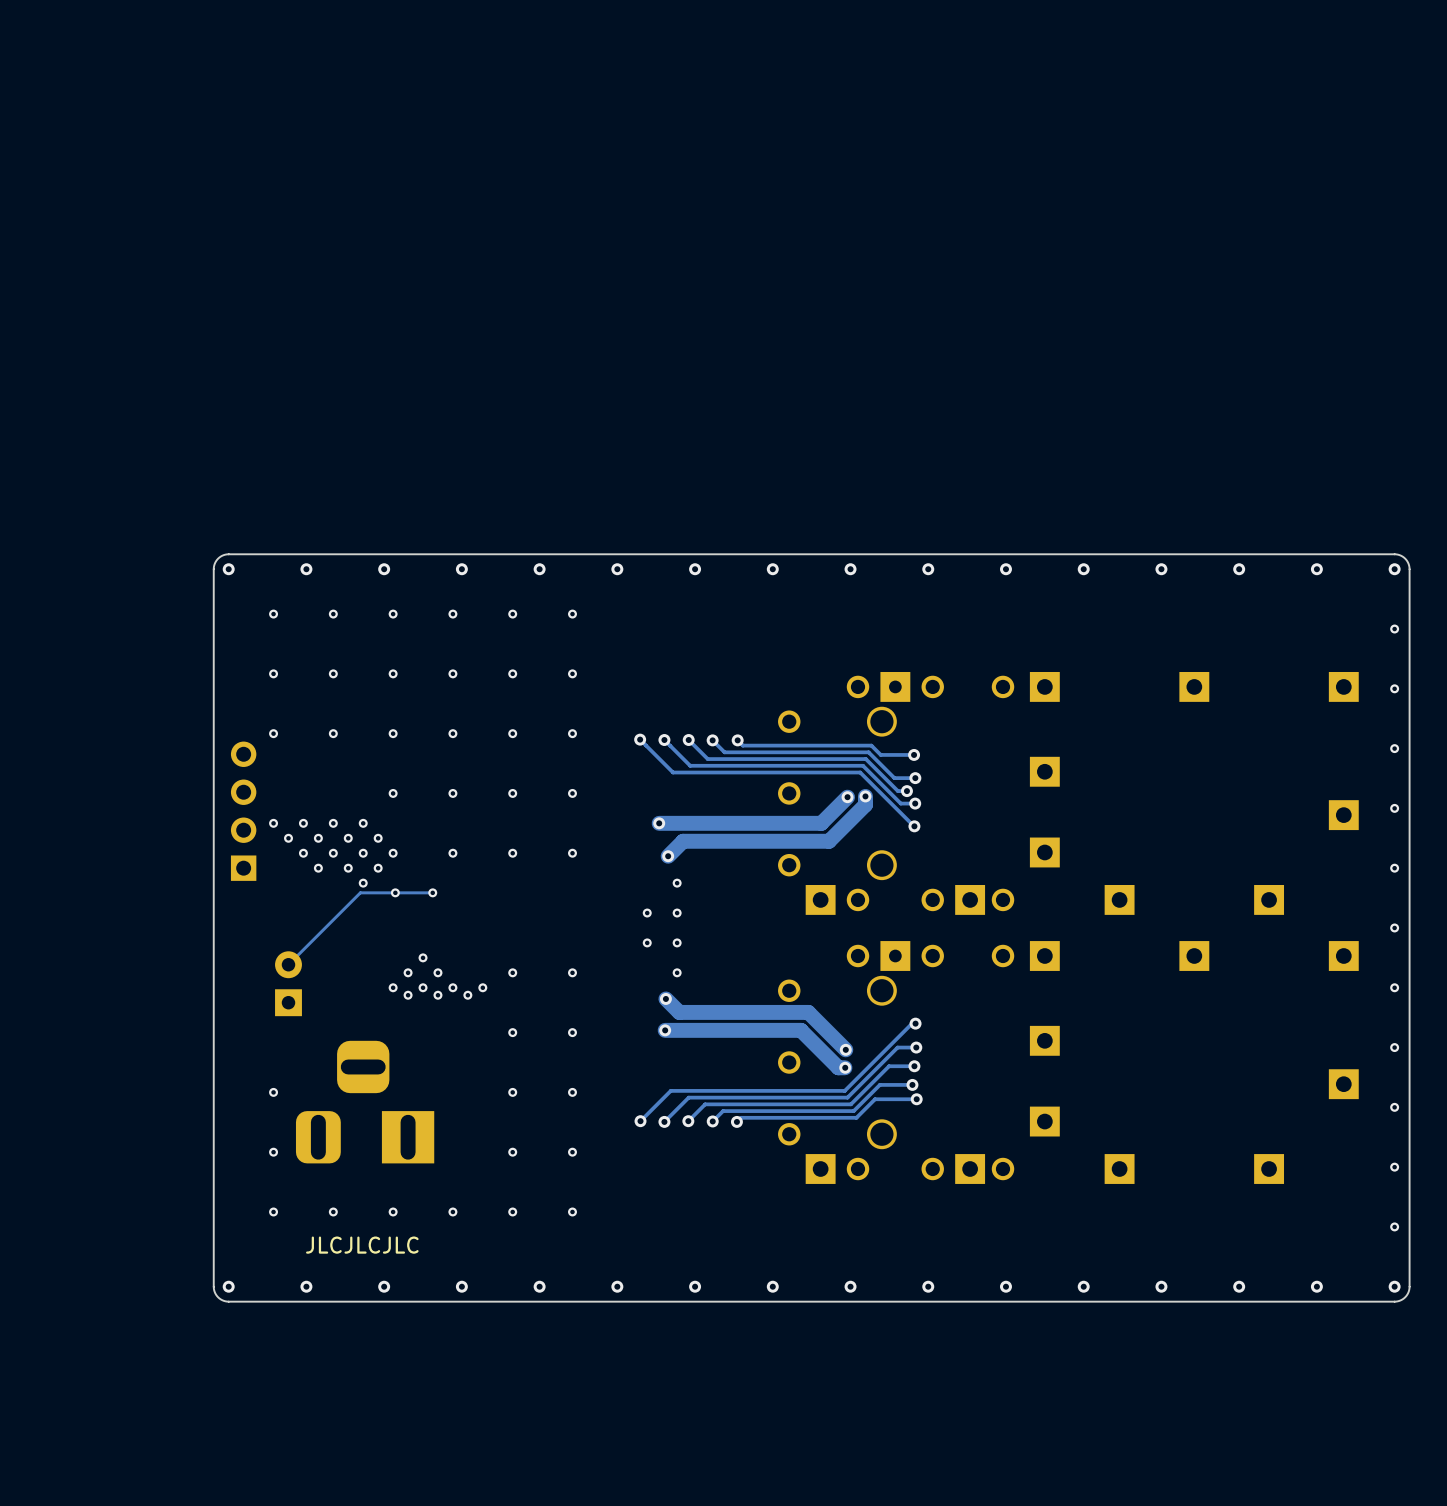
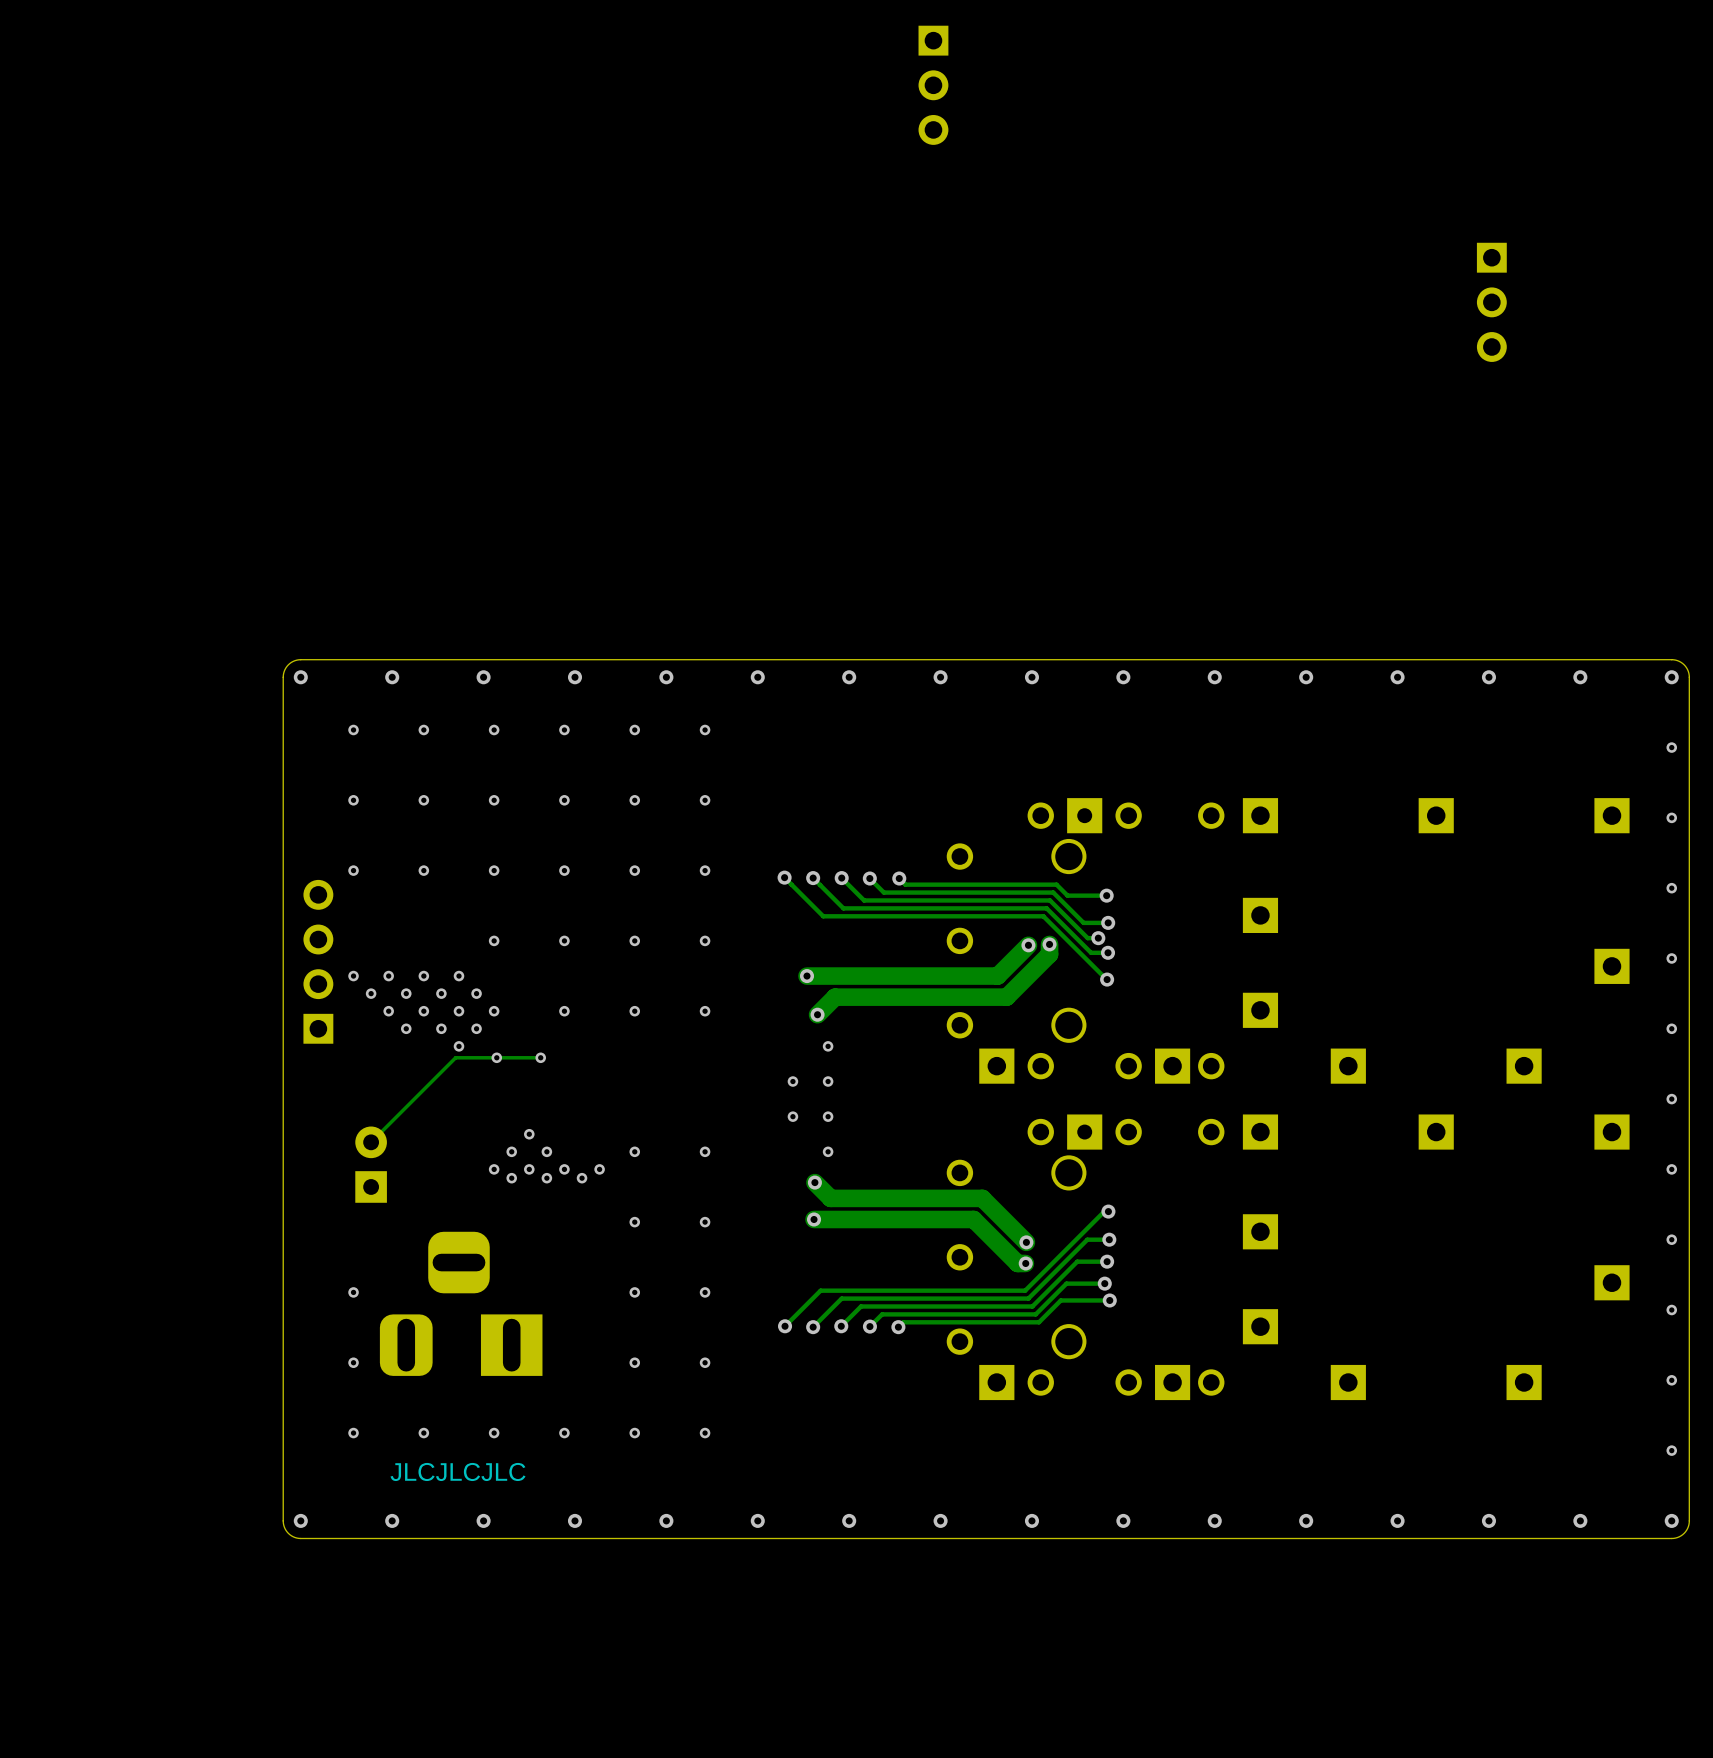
part: none -> (933, 85)
part: none -> (1491, 302)

